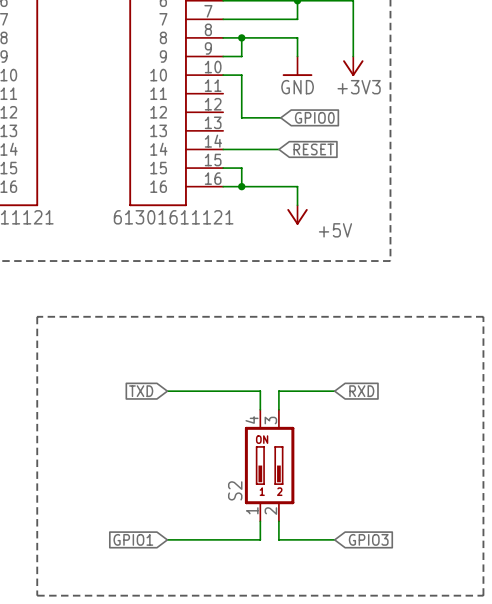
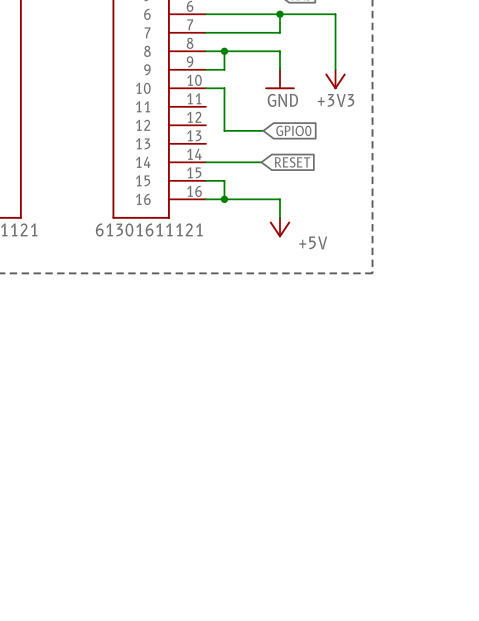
line: (37, 316) (483, 316) (483, 595) (37, 595) (37, 316) -> none
global label: TXD (141, 391) -> none
wire: (167, 391) (260, 391) (260, 409) -> none
wire: (334, 391) (278, 391) (278, 409) -> none
global label: RXD (361, 391) -> none
S2: (269, 465) -> none
wire: (260, 521) (260, 539) (167, 539) -> none
wire: (278, 521) (278, 539) (334, 539) -> none
global label: GPIO1 (133, 539) -> none
global label: GPIO3 (368, 539) -> none

